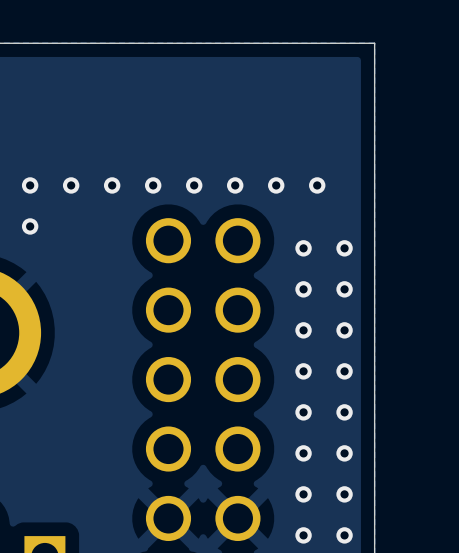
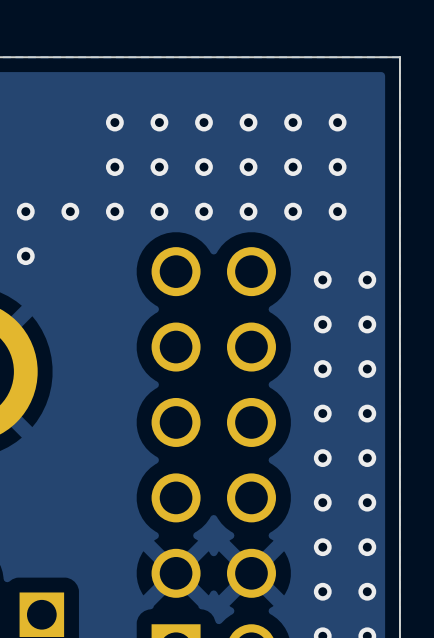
via: none -> (114, 122)
via: none -> (159, 122)
via: none -> (203, 122)
via: none -> (248, 122)
via: none -> (293, 122)
via: none -> (337, 122)
via: none -> (114, 167)
via: none -> (159, 167)
via: none -> (203, 167)
via: none -> (248, 167)
via: none -> (293, 167)
via: none -> (337, 167)

